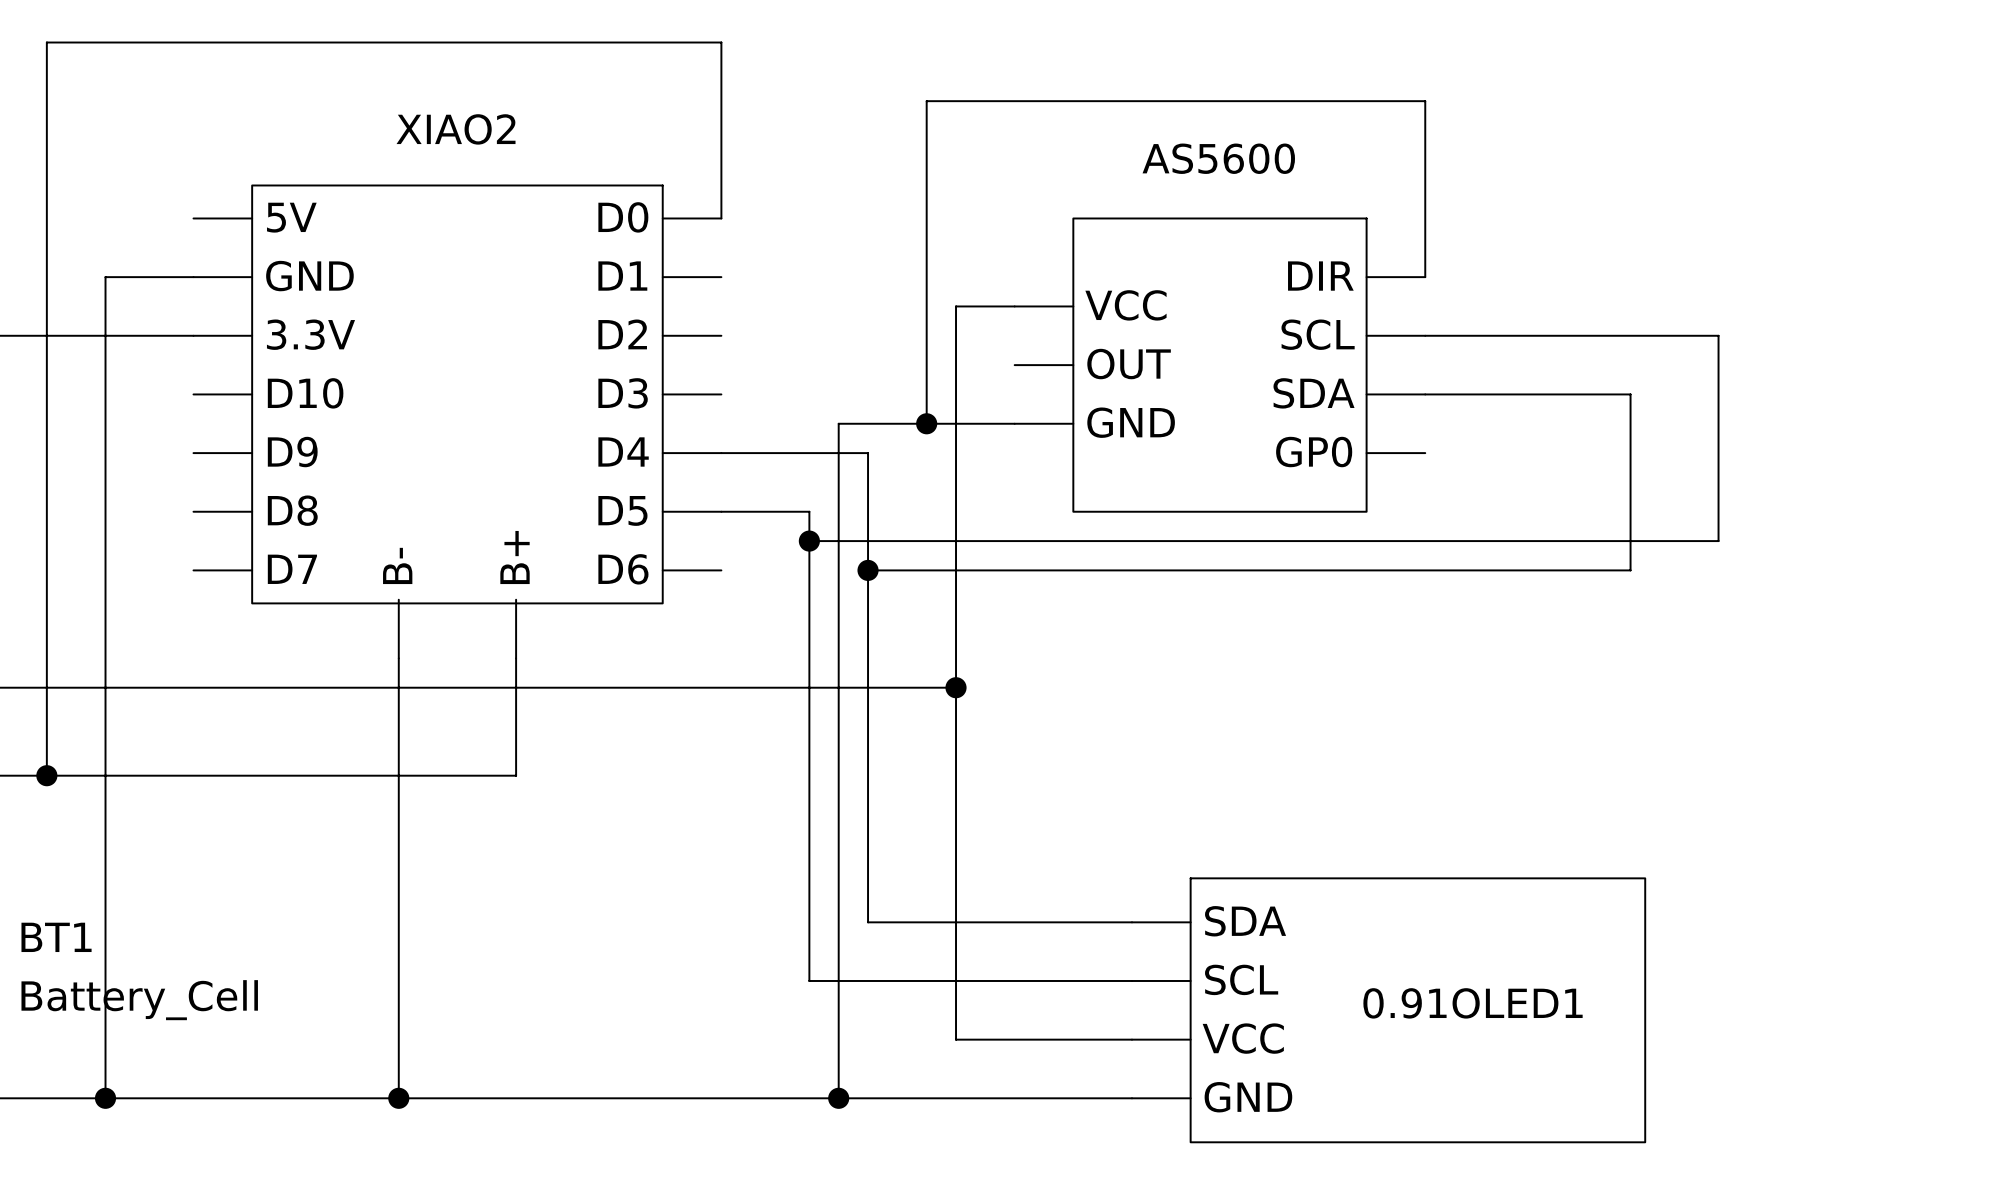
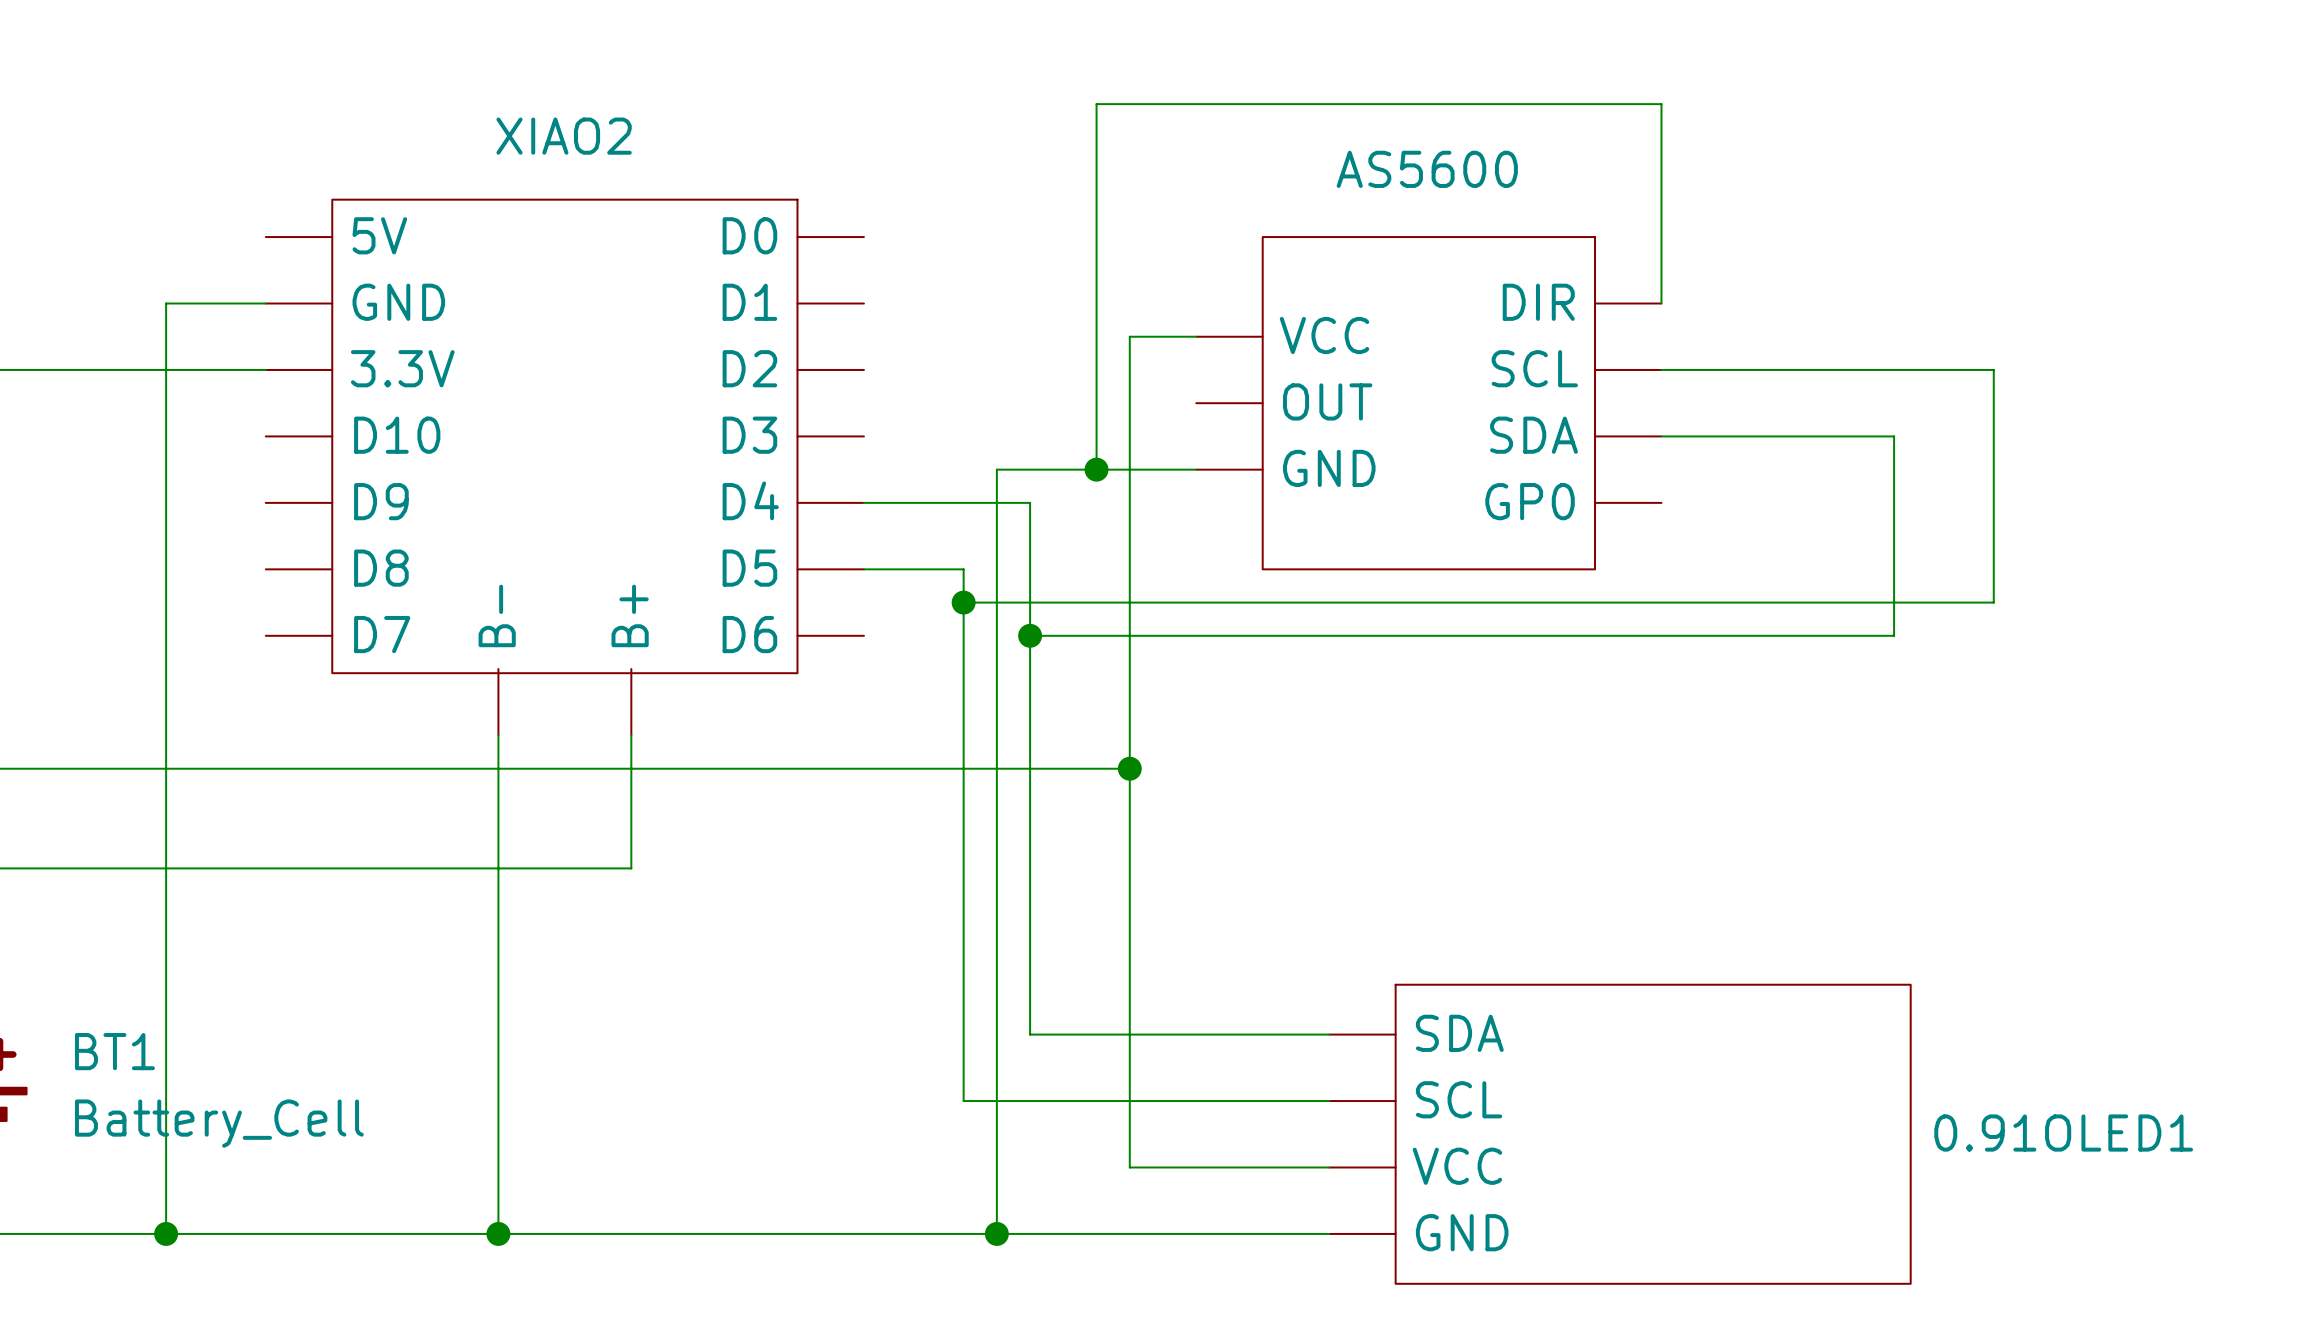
wire: (721, 218) (721, 42) (46, 42) (46, 775) -> none
junction: (46, 775) -> none
0.91OLED1 name position: 0.91OLED1 (1473, 1003) -> 0.91OLED1 (2063, 1133)

